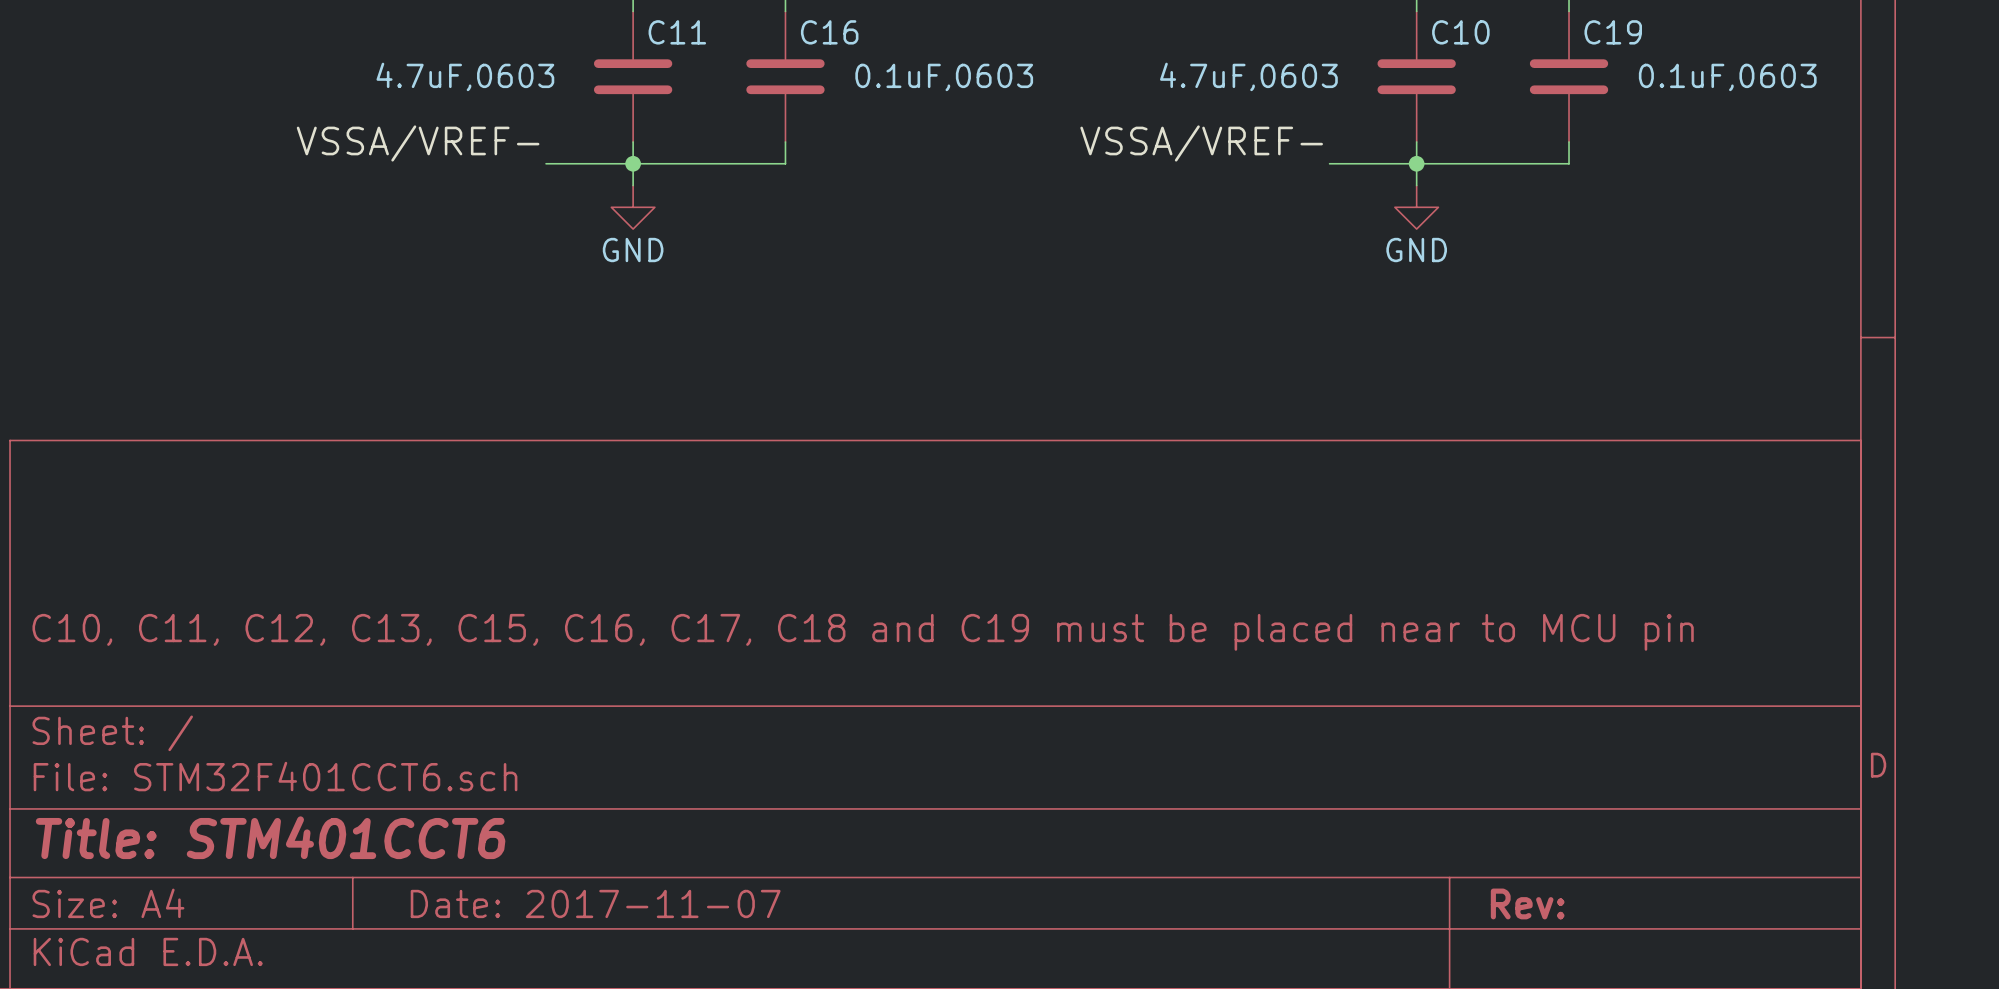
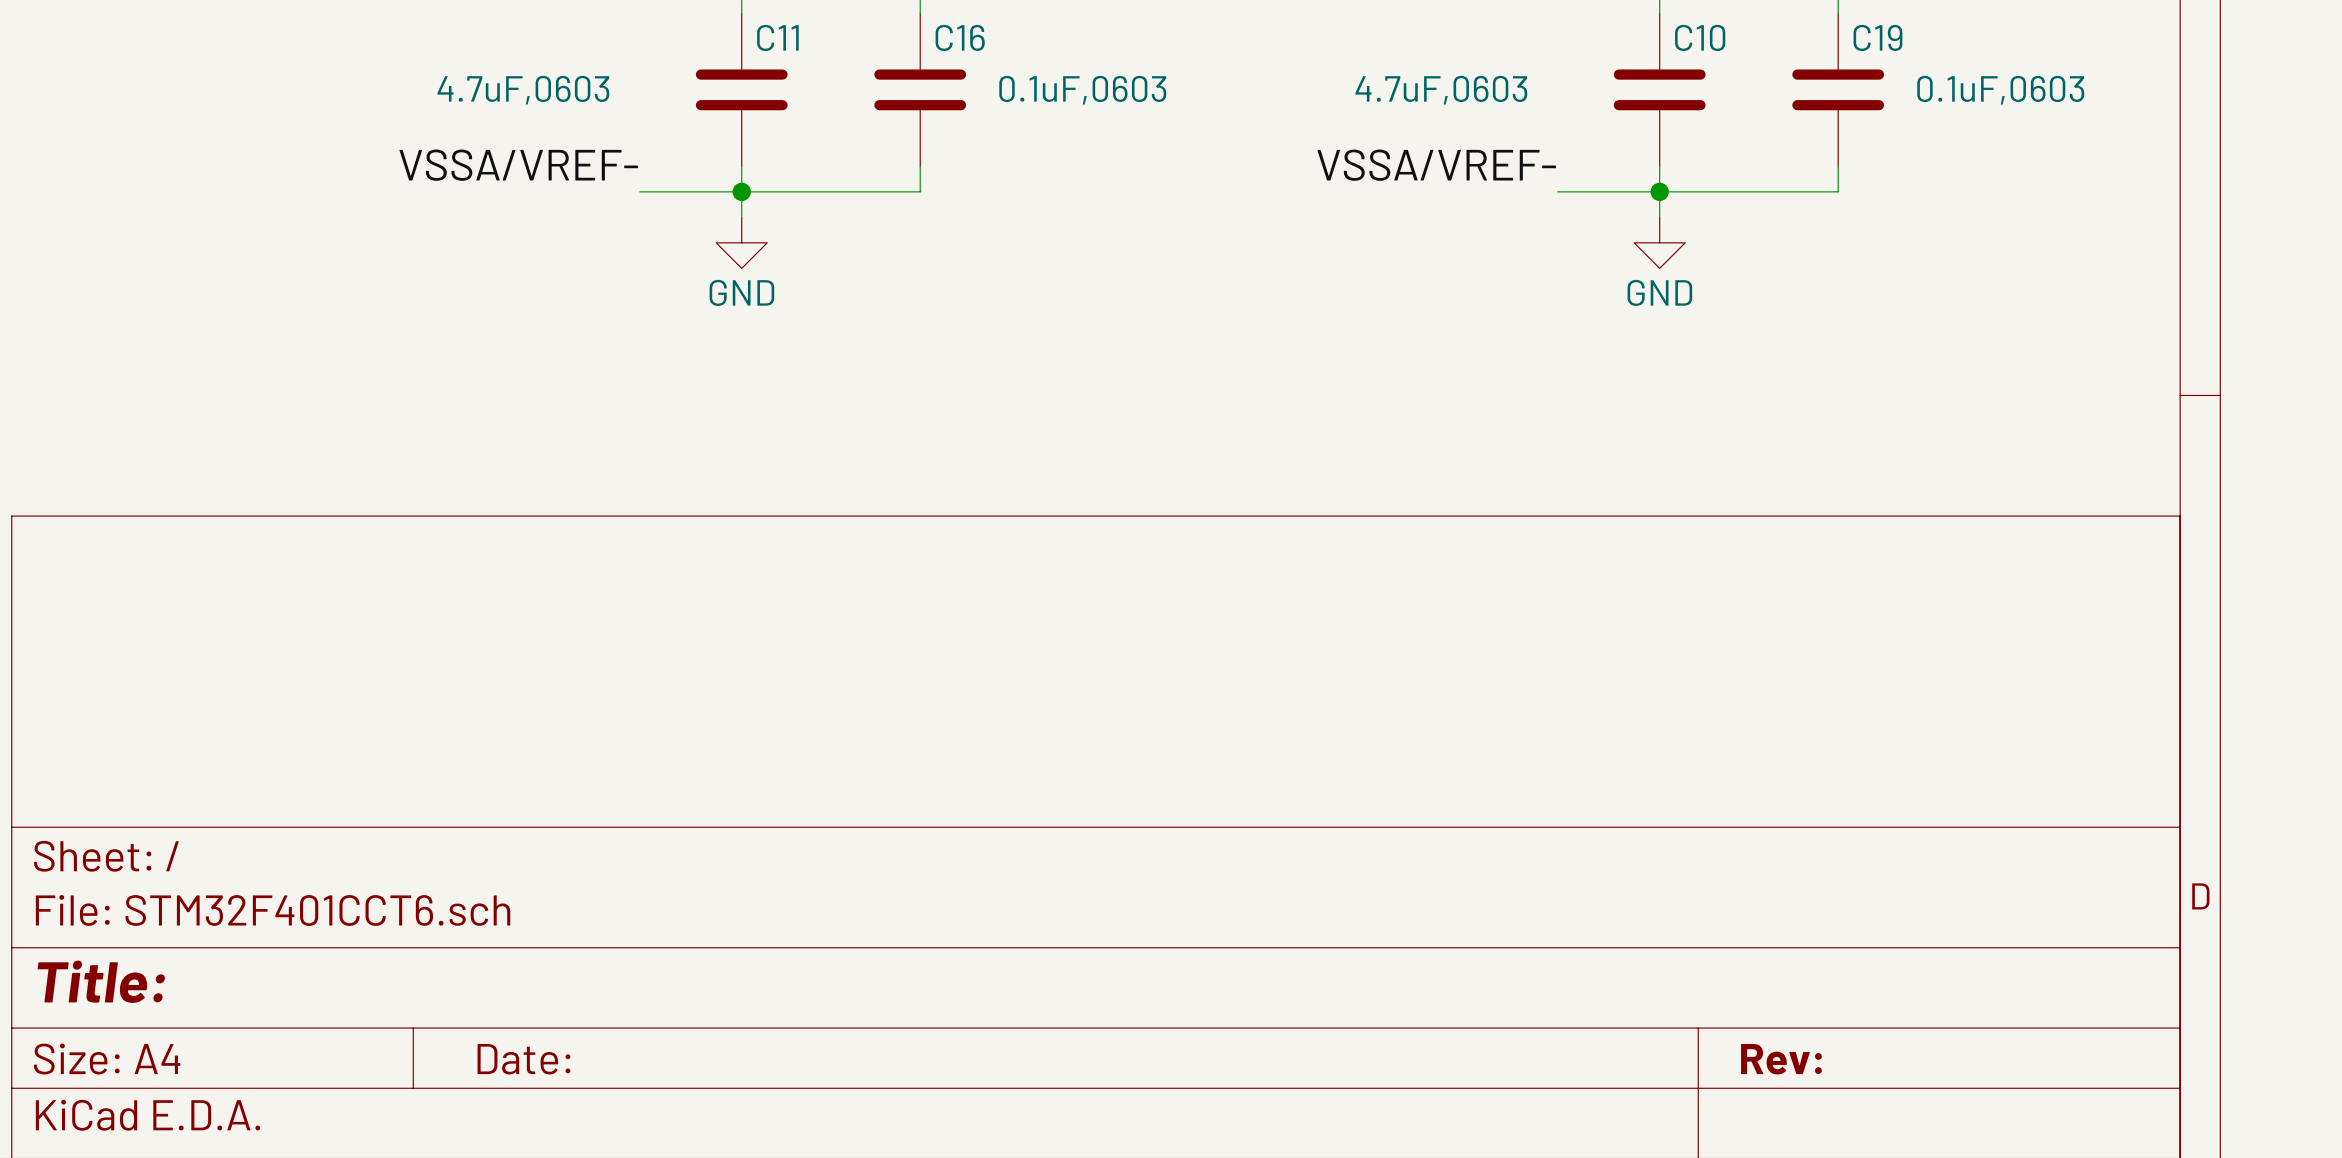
title block: C10, C11, C12, C13, C15, C16, C17, C18 and C19 must be placed near to MCU pin (863, 632) -> none
title block: Title: STM401CCT6 (270, 837) -> Title: (101, 981)
title block: Date: 2017-11-07 (595, 903) -> Date: (523, 1059)

